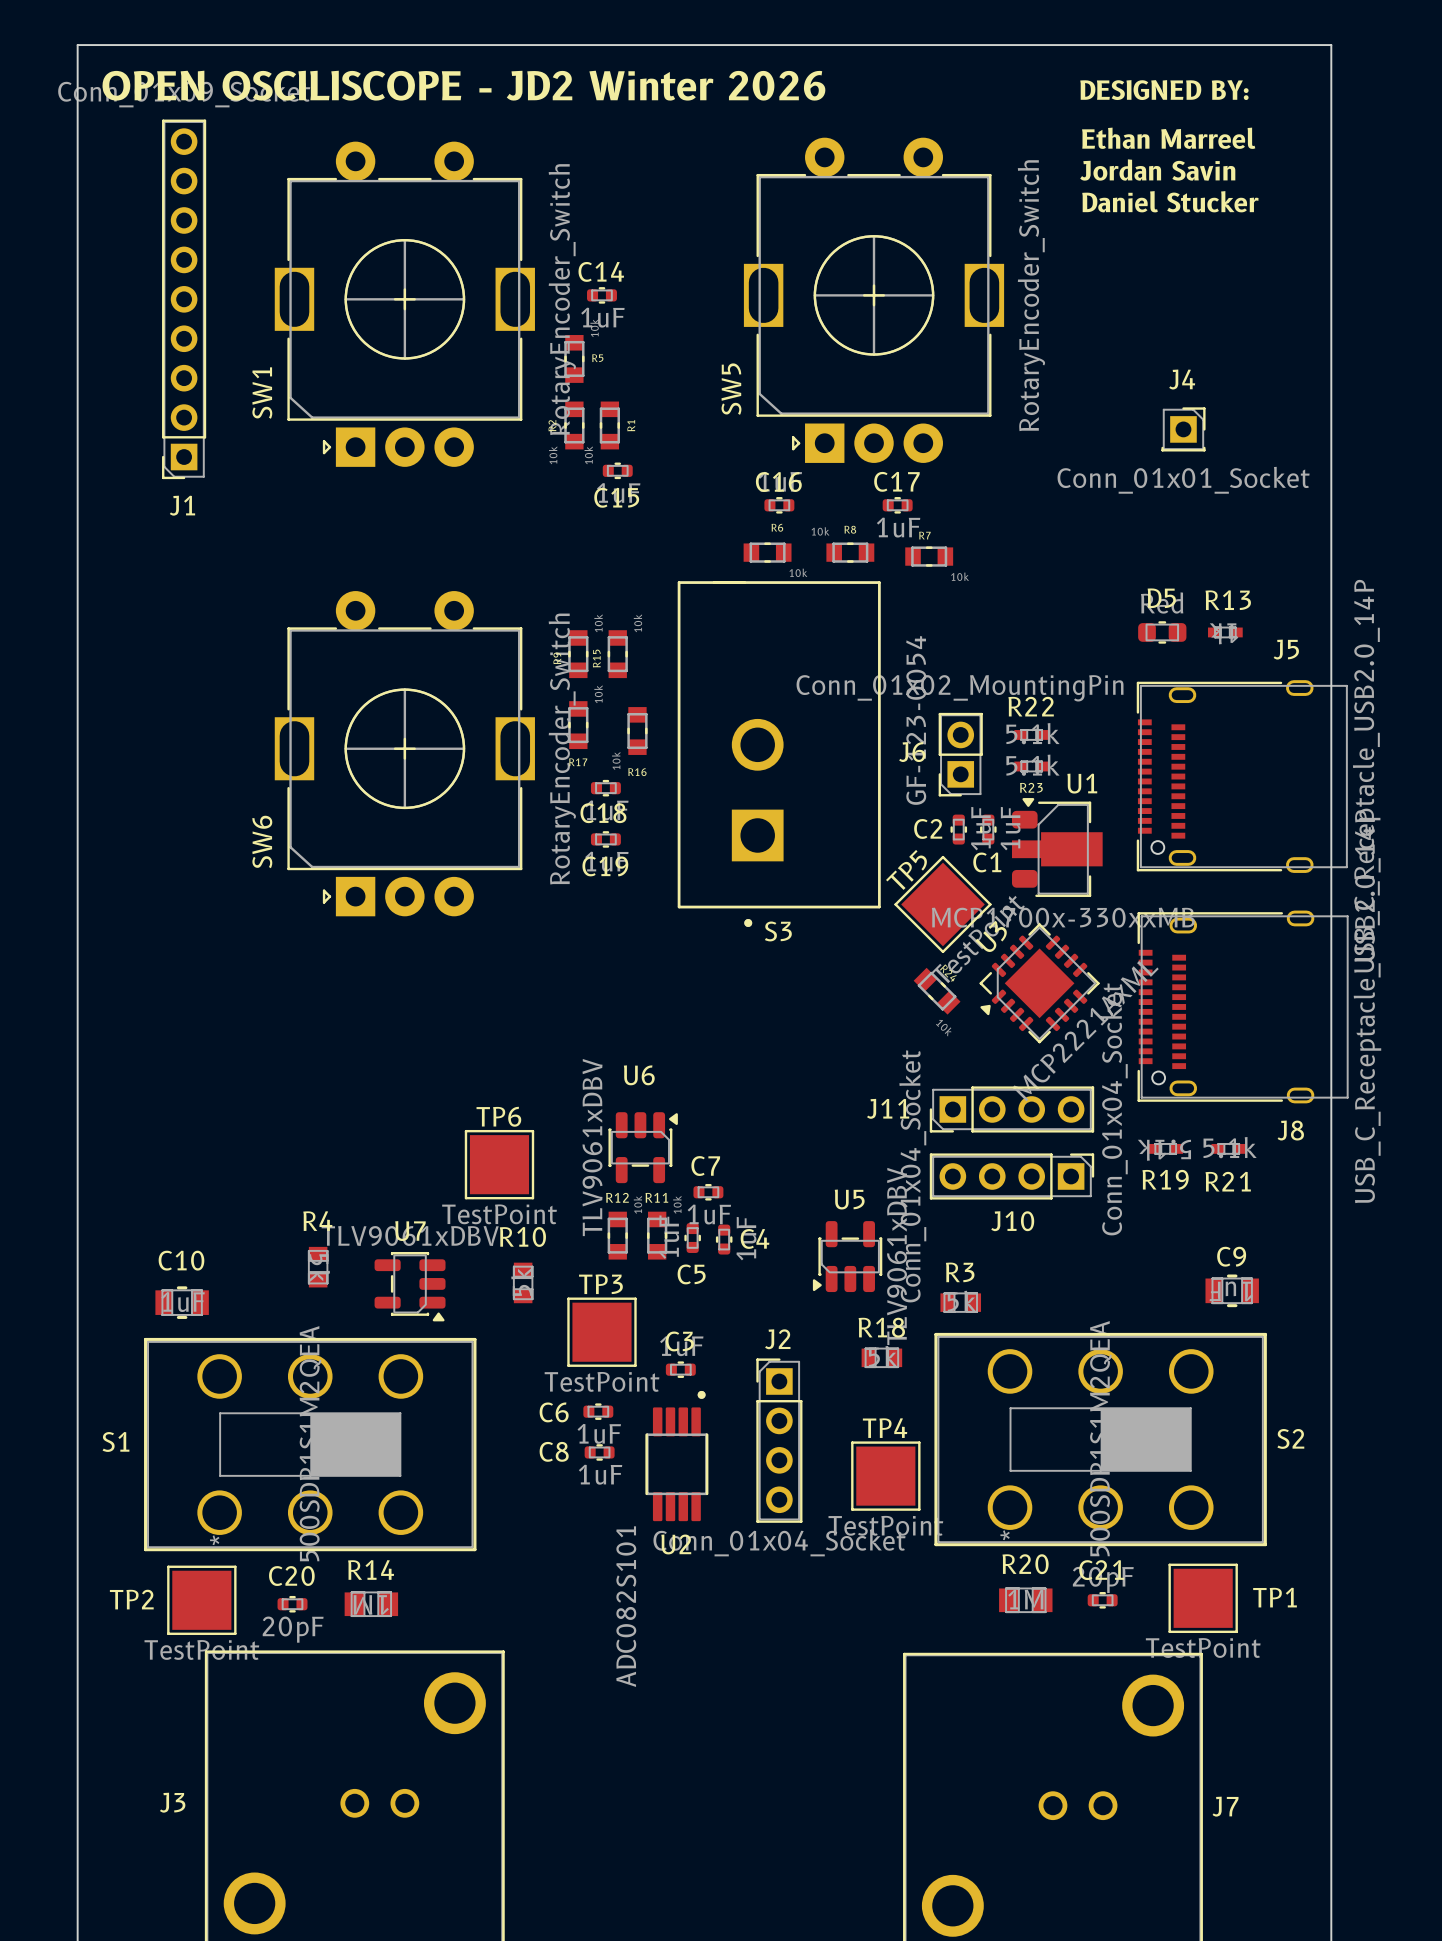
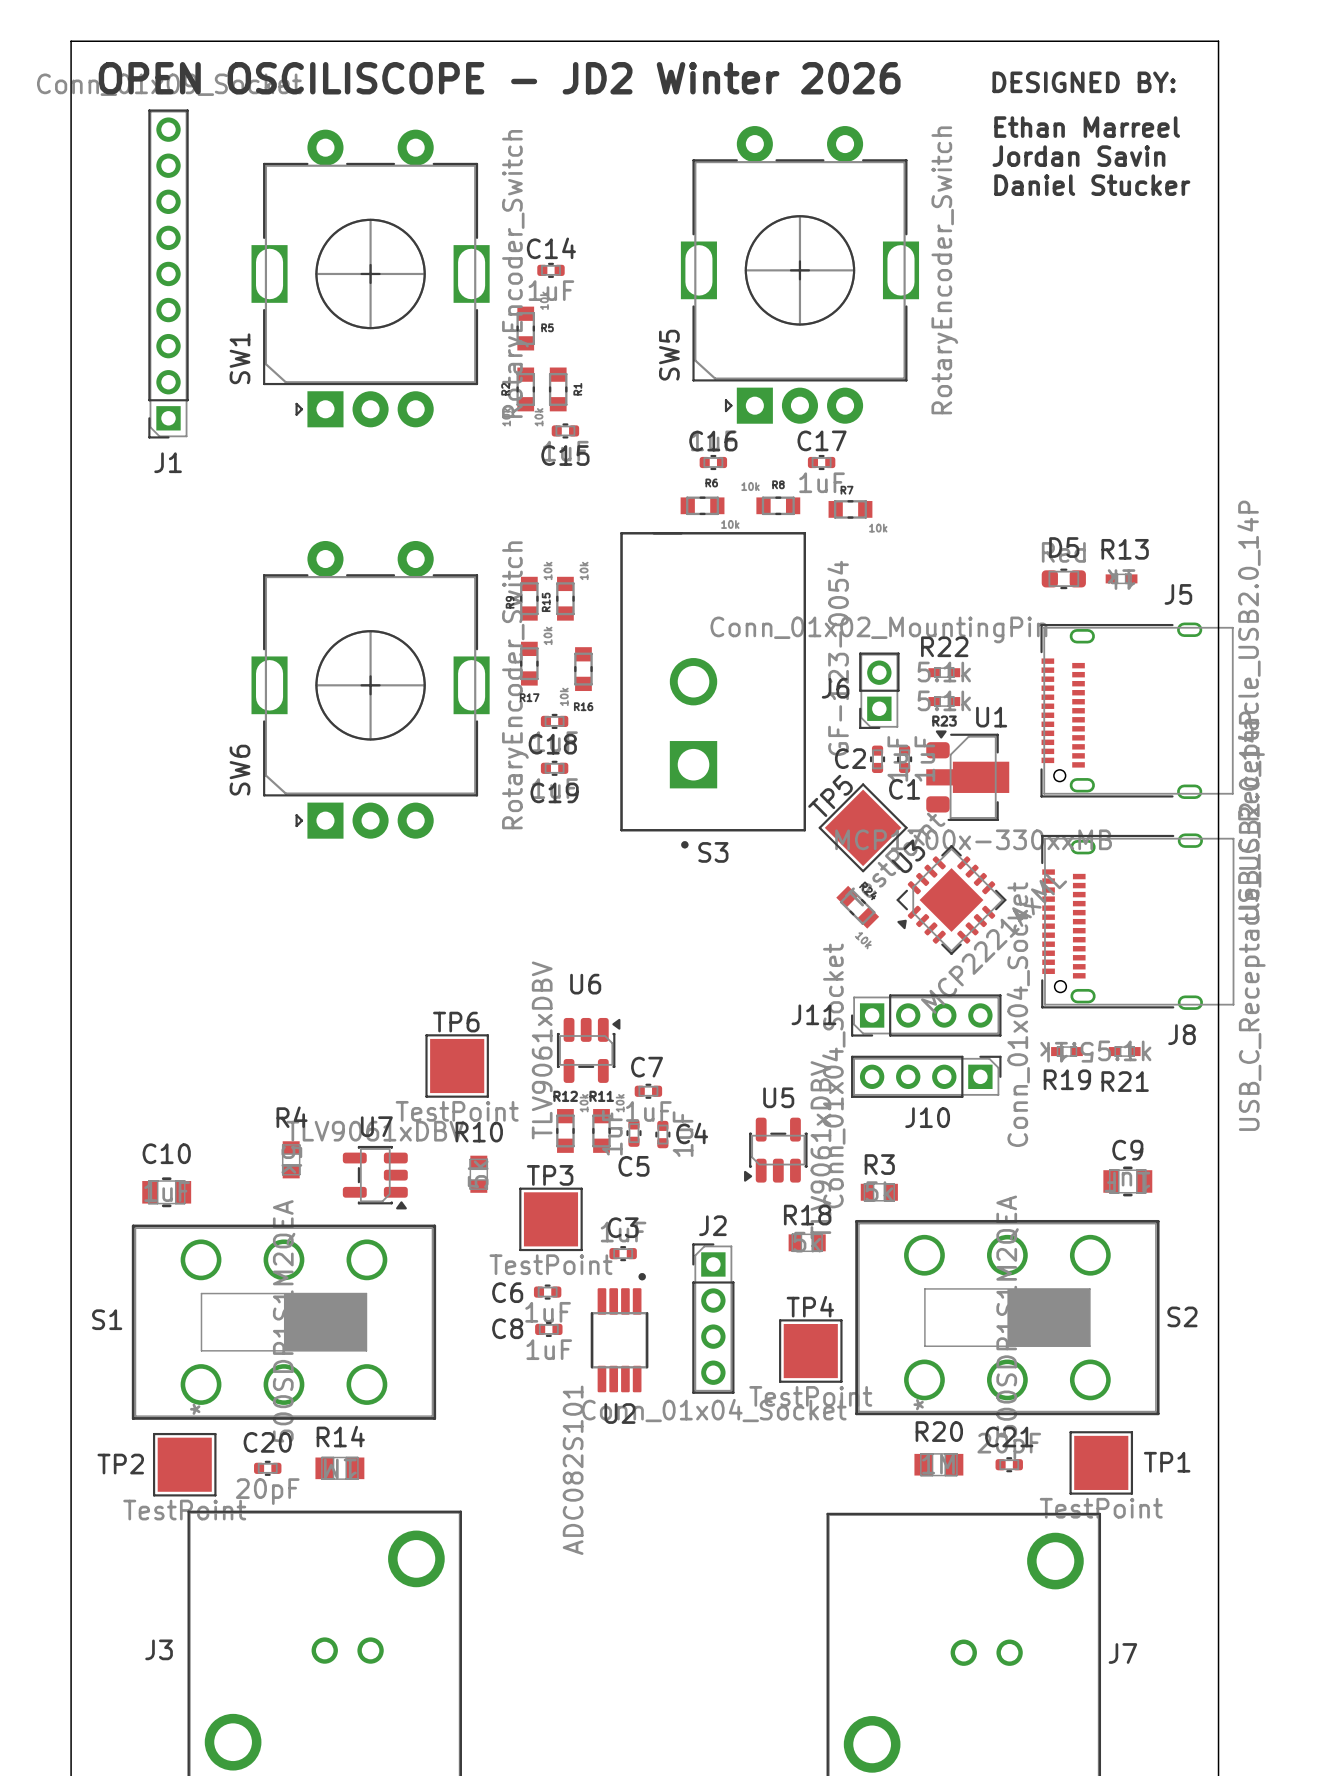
J4: Conn_01x01_Socket (1183, 429) -> none

